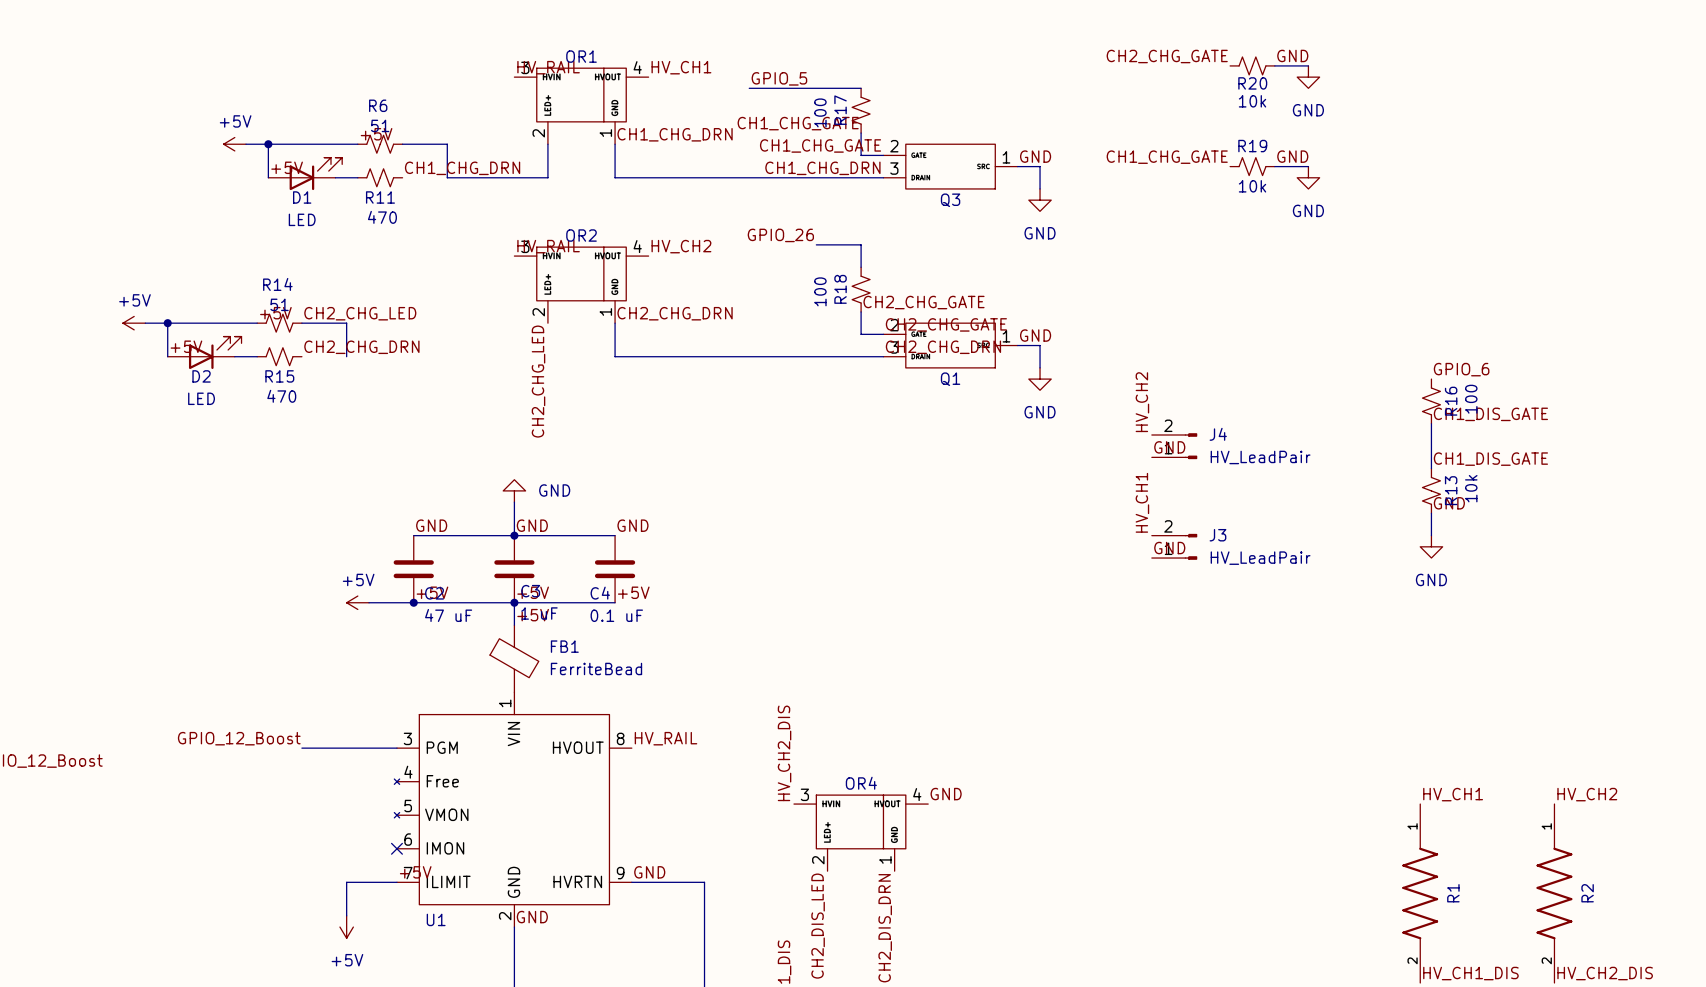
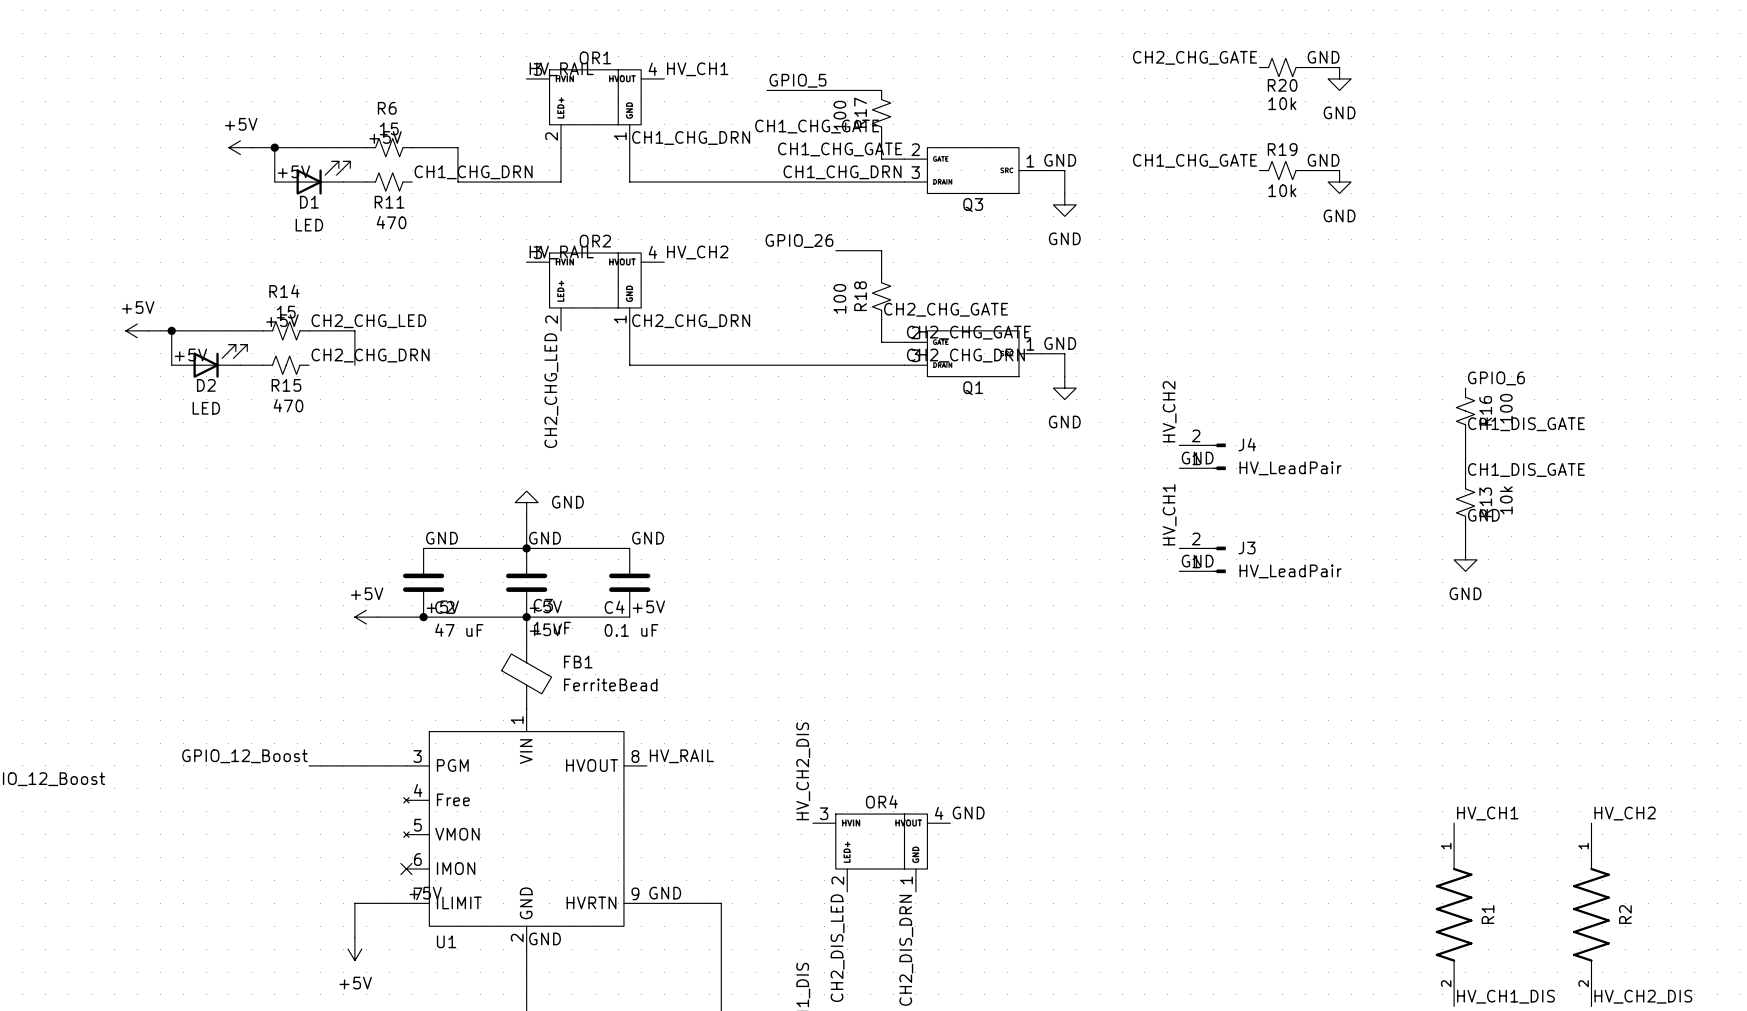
R6 value: 51 (380, 125) -> 15 (389, 128)
R14 value: 51 (279, 304) -> 15 (286, 312)

